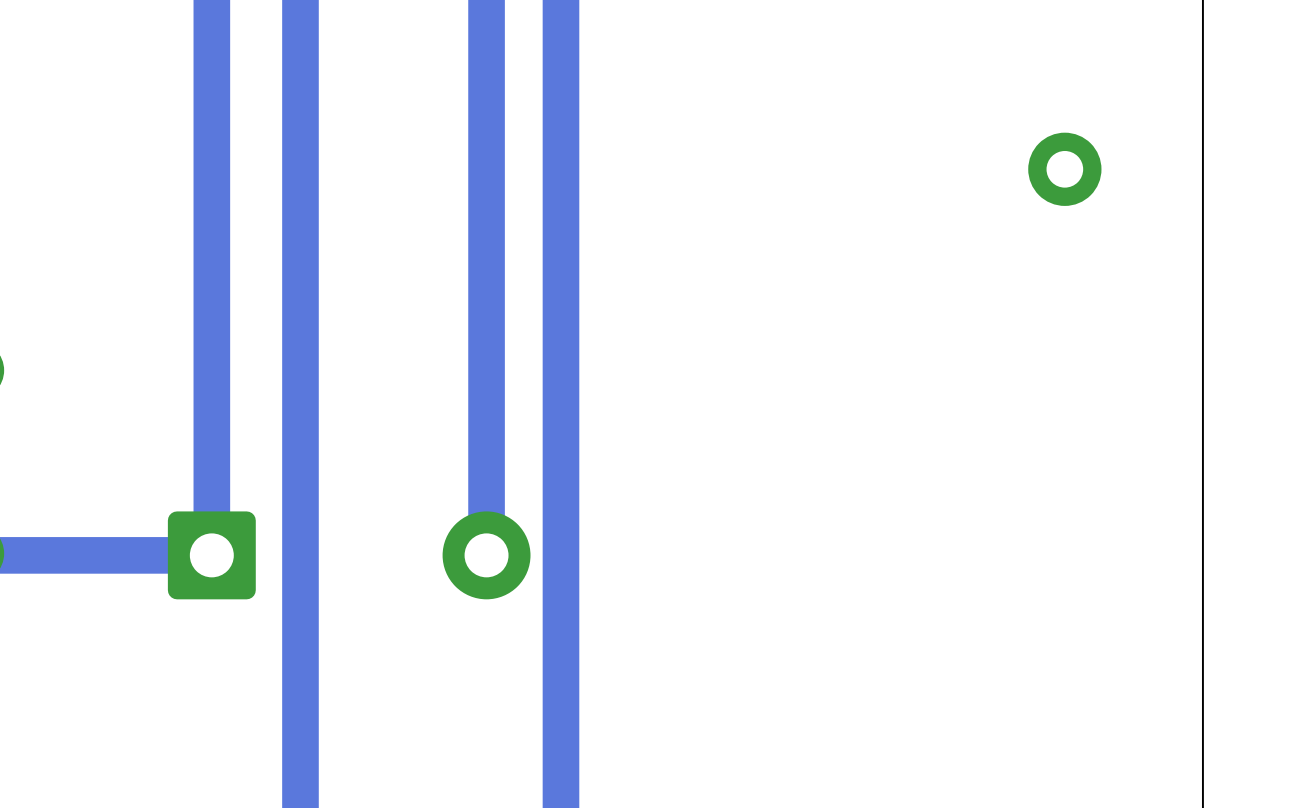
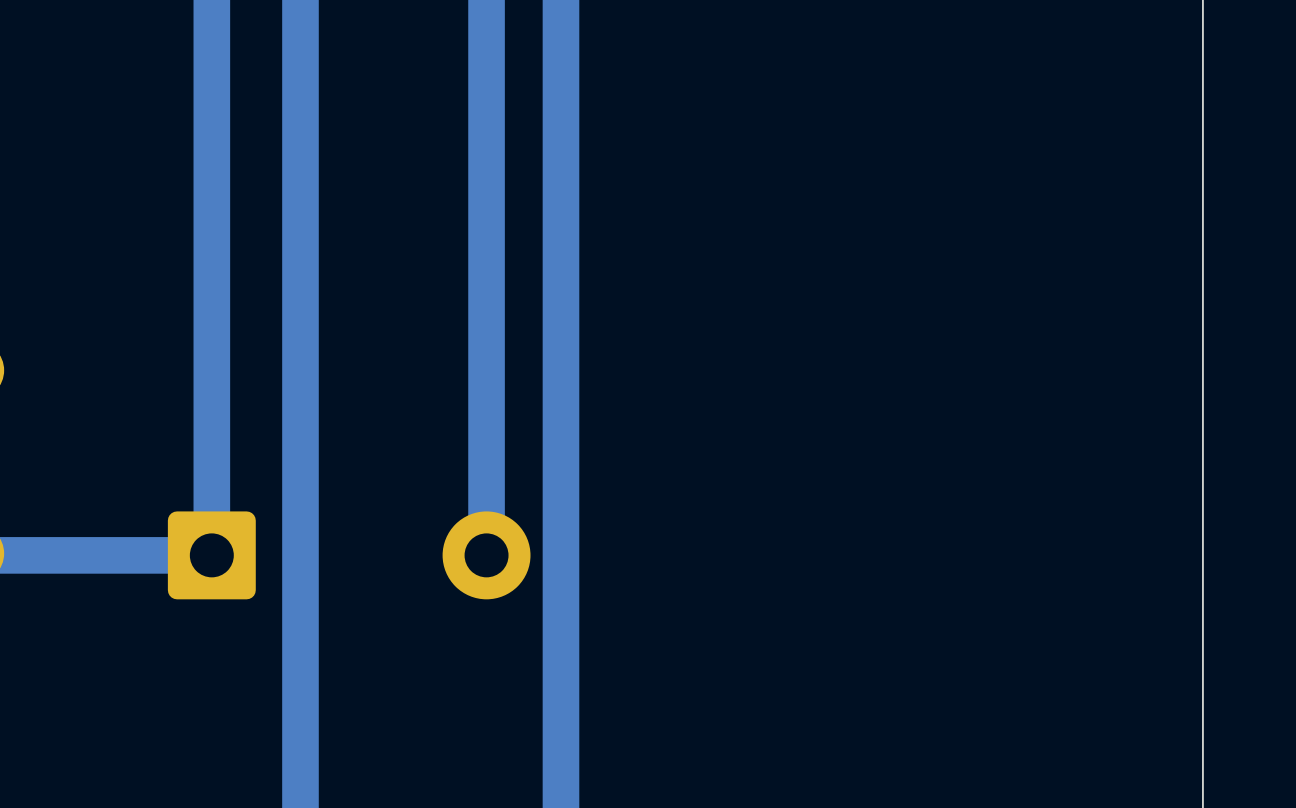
part: (1064, 169) -> none

